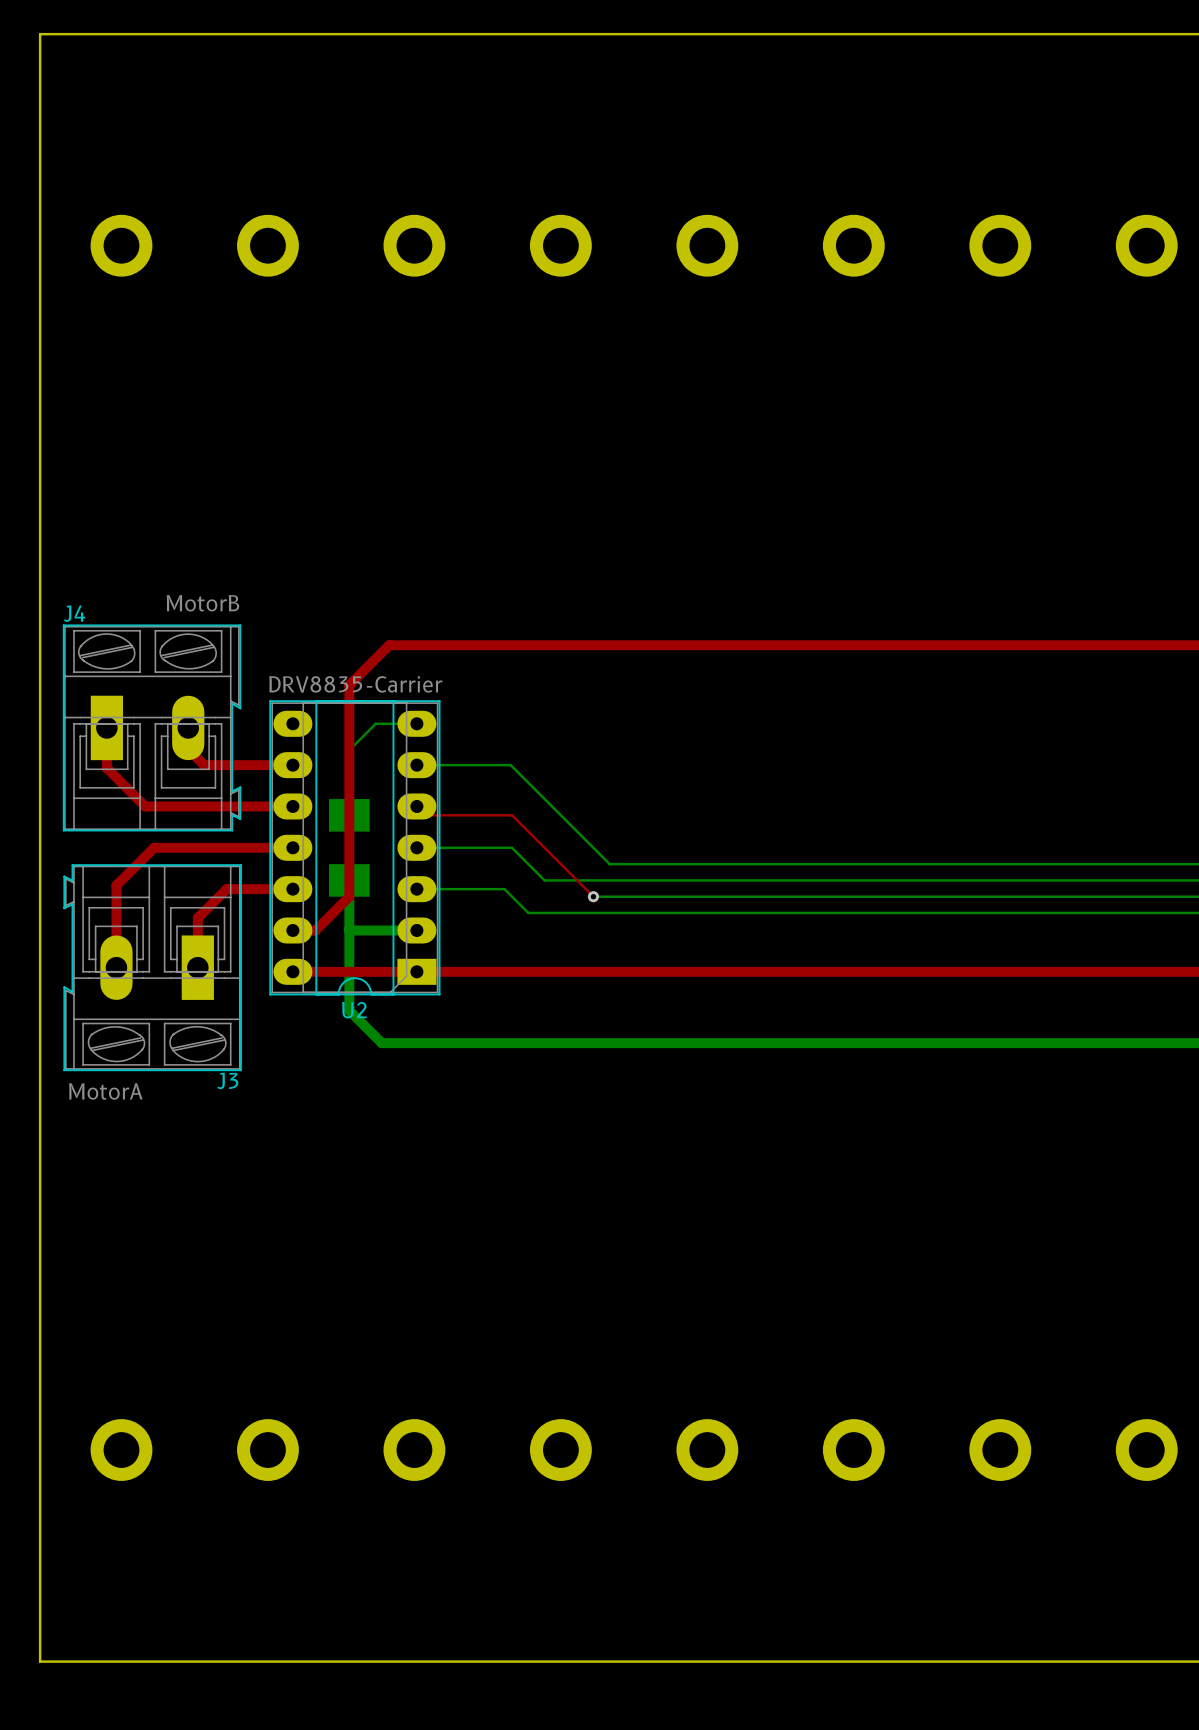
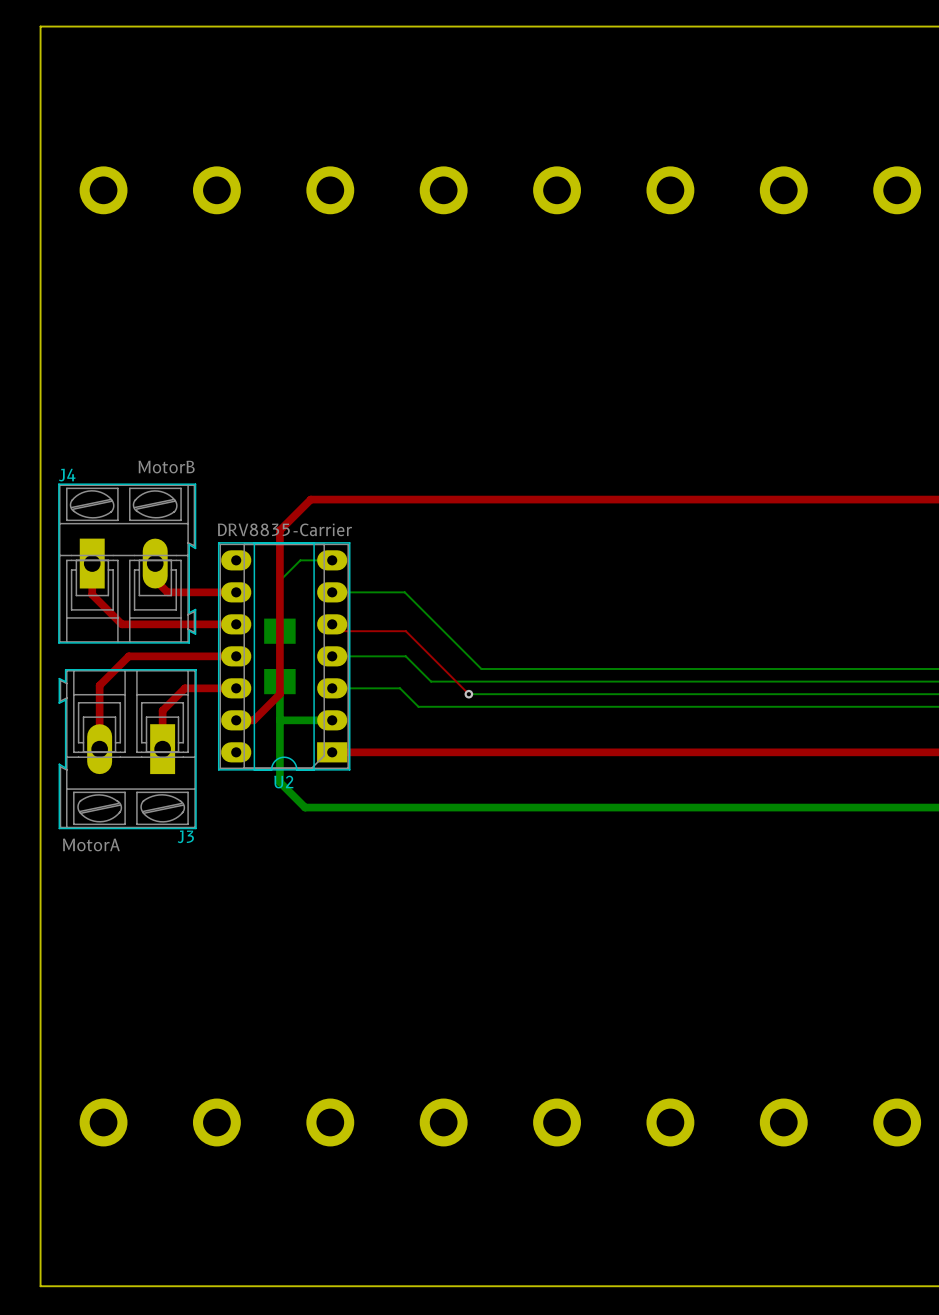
top track: (292, 971) (416, 971) -> none

